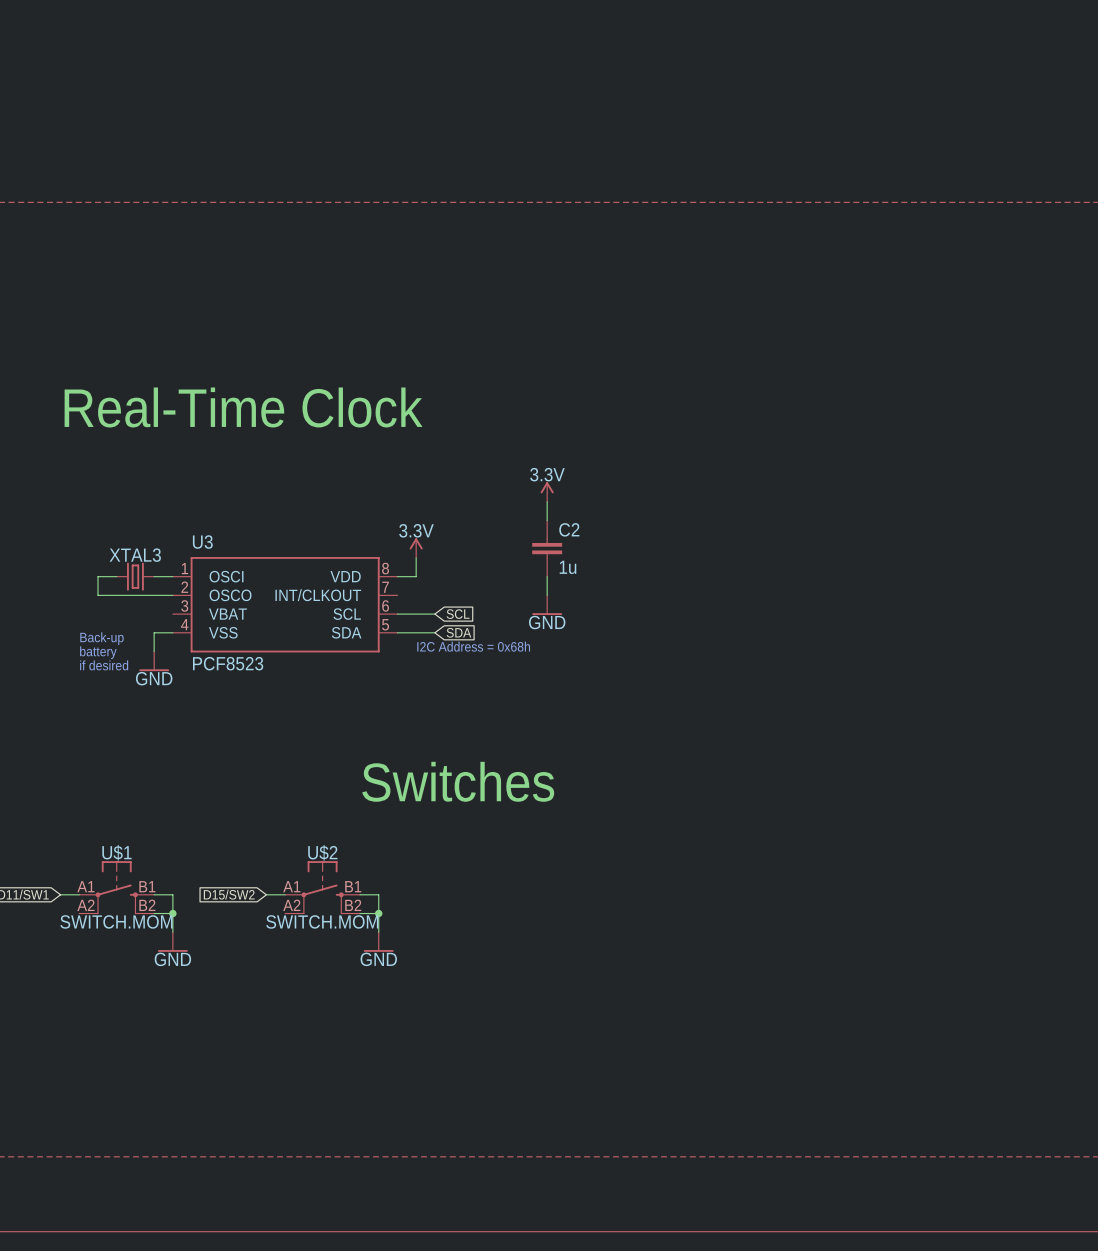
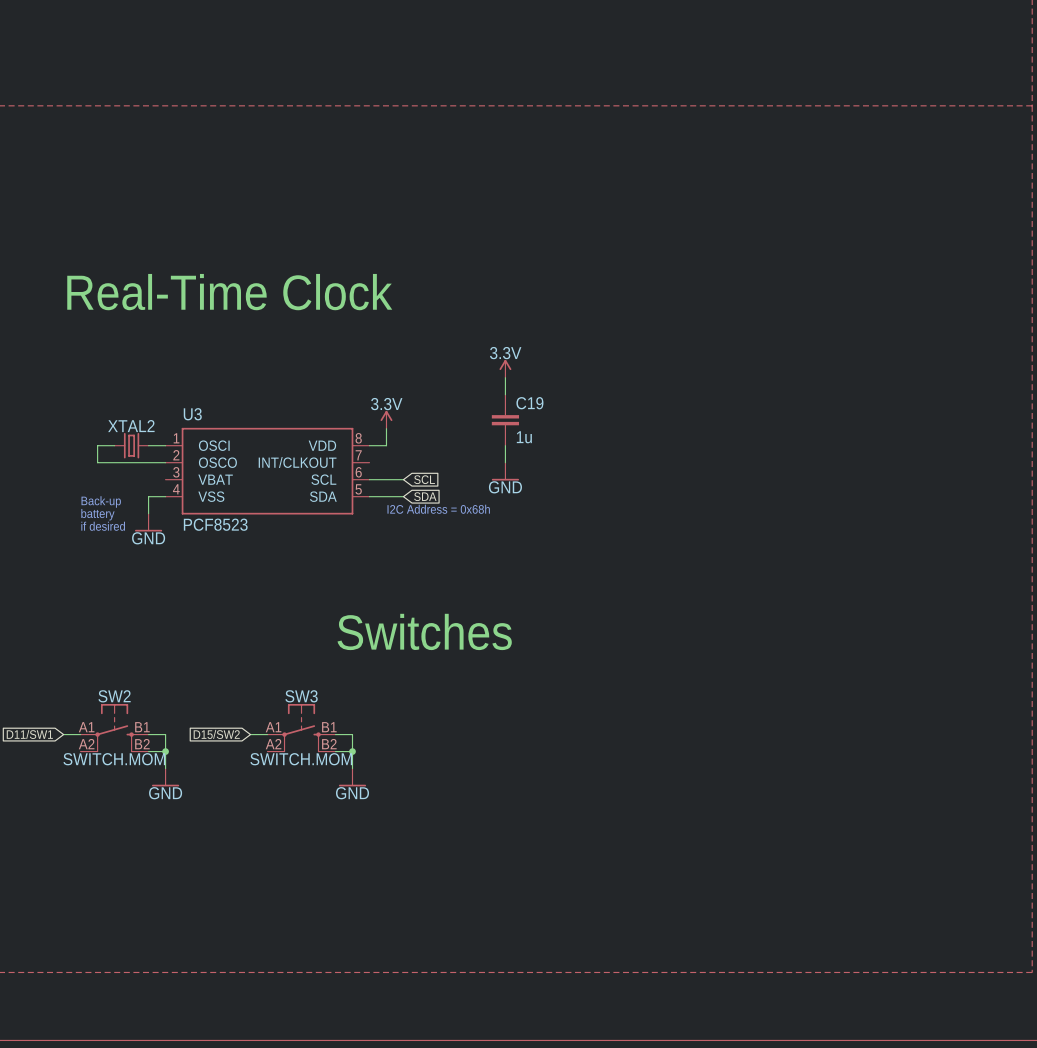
C2 name: C2 (569, 529) -> C19 (529, 403)
XTAL3 name: XTAL3 (135, 555) -> XTAL2 (131, 426)
U$1 name: U$1 (116, 852) -> SW2 (114, 696)
U$2 name: U$2 (322, 852) -> SW3 (301, 696)

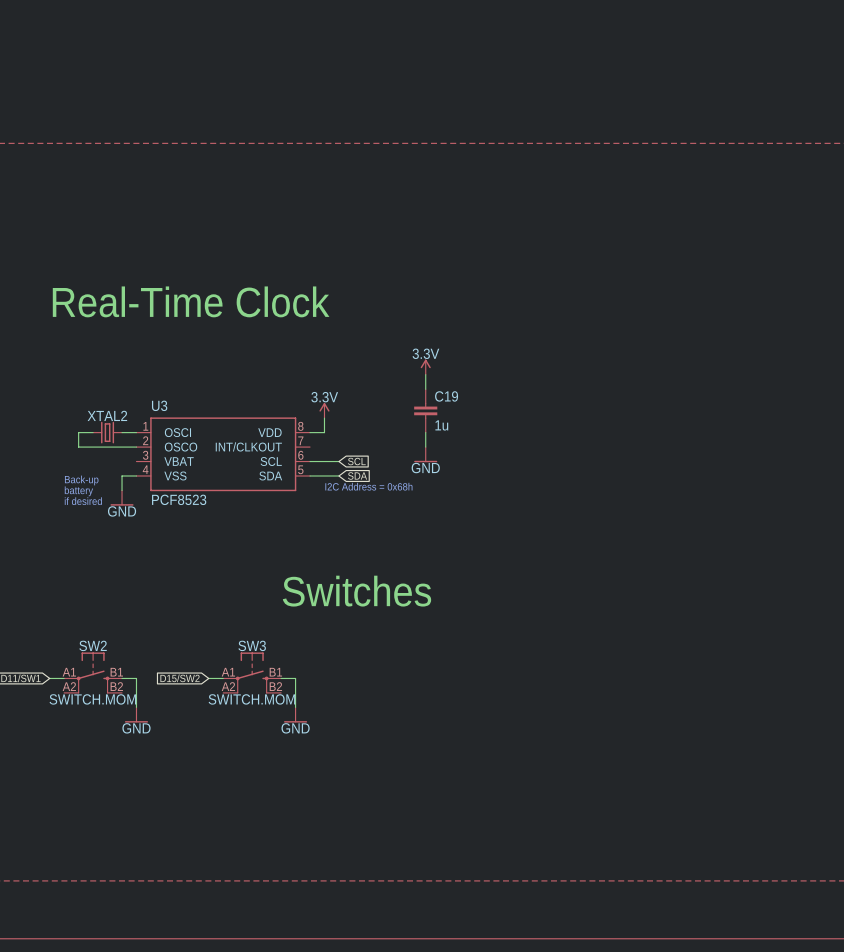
wire: (148, 751) (165, 751) -> none
junction: (165, 751) -> none
wire: (335, 751) (352, 751) -> none
junction: (352, 751) -> none

